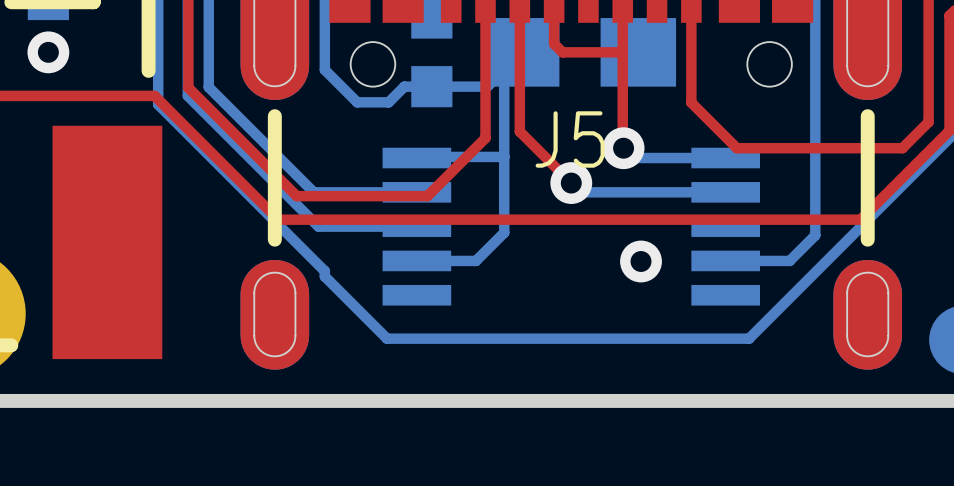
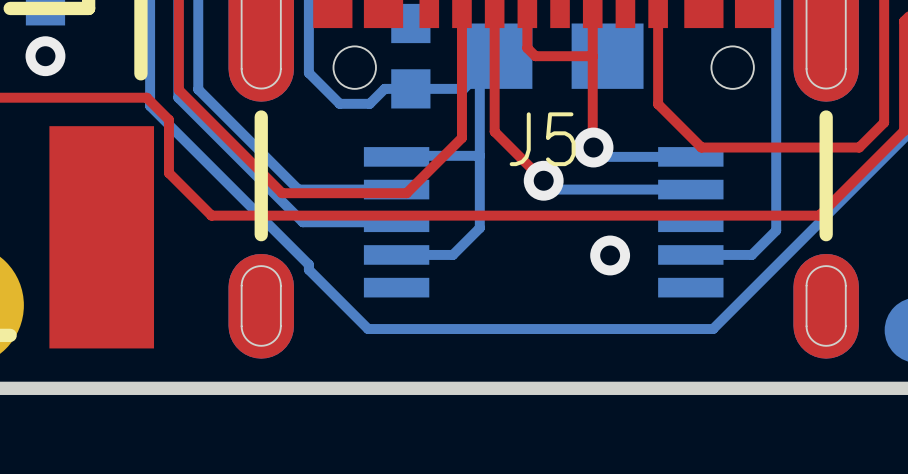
top track: (177, 119) (278, 219) -> (168, 119) (168, 173) (211, 215) (264, 215)

